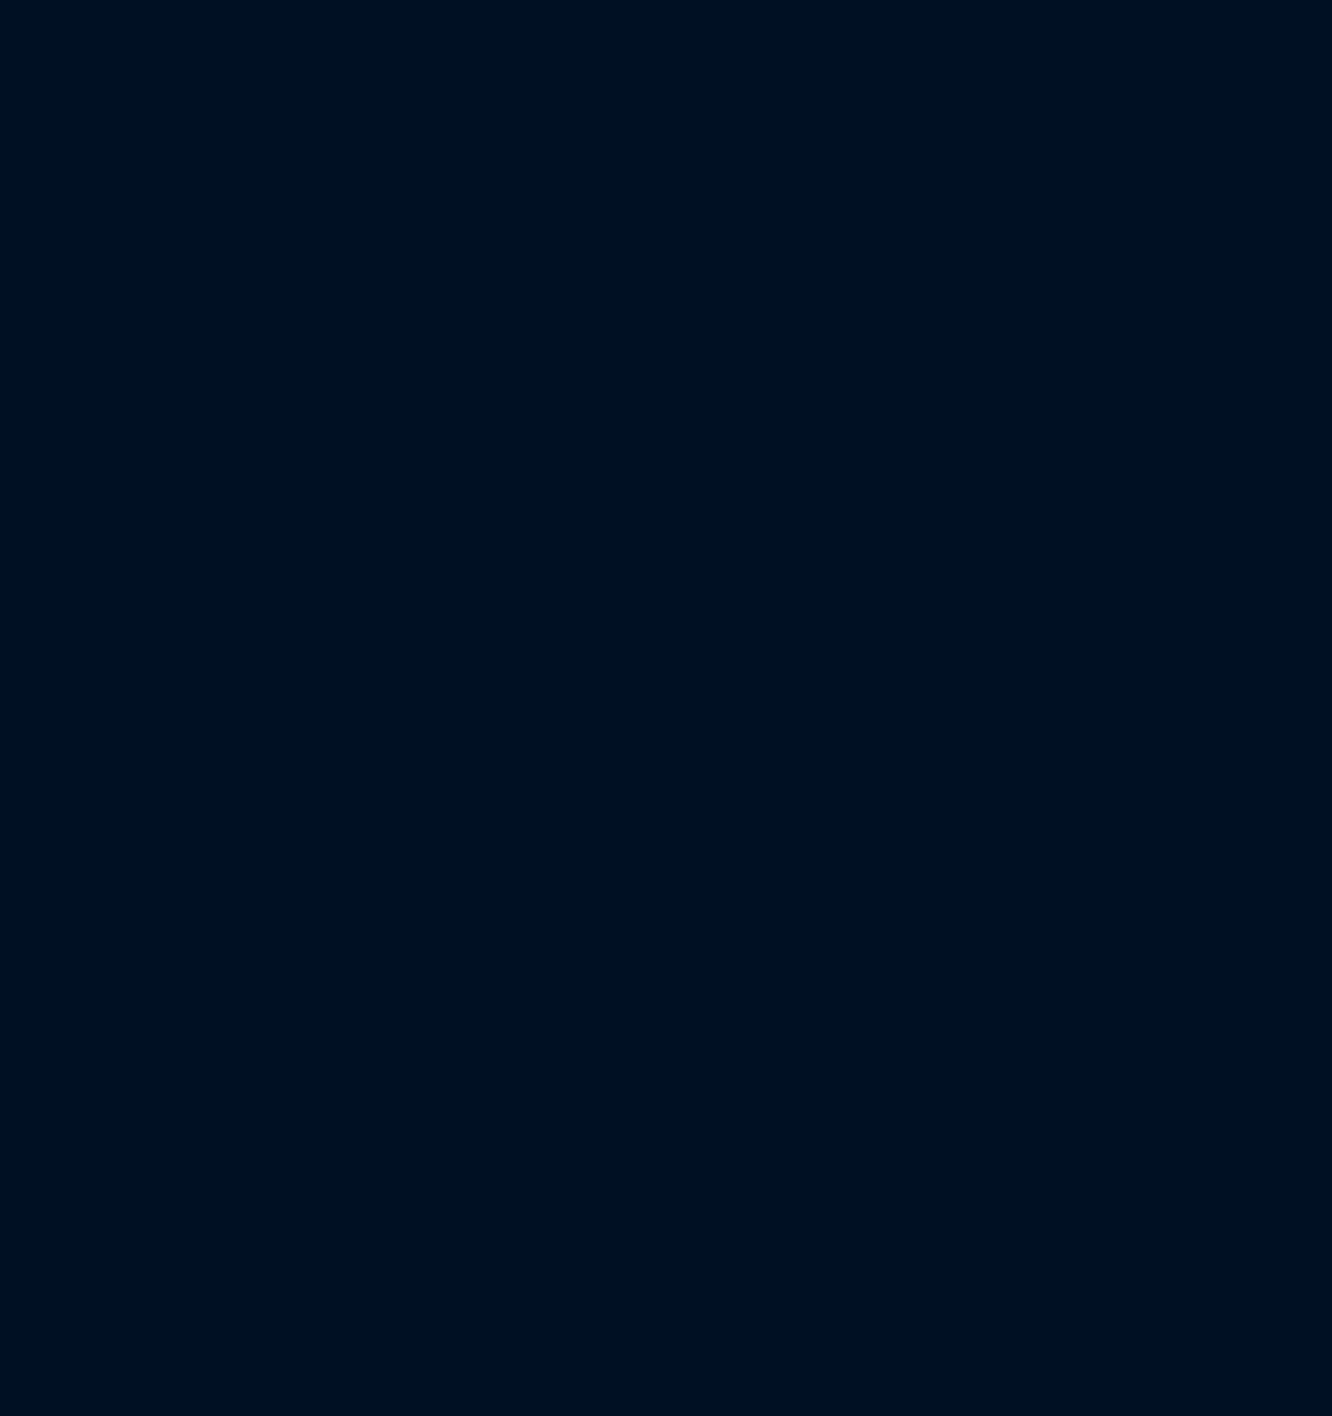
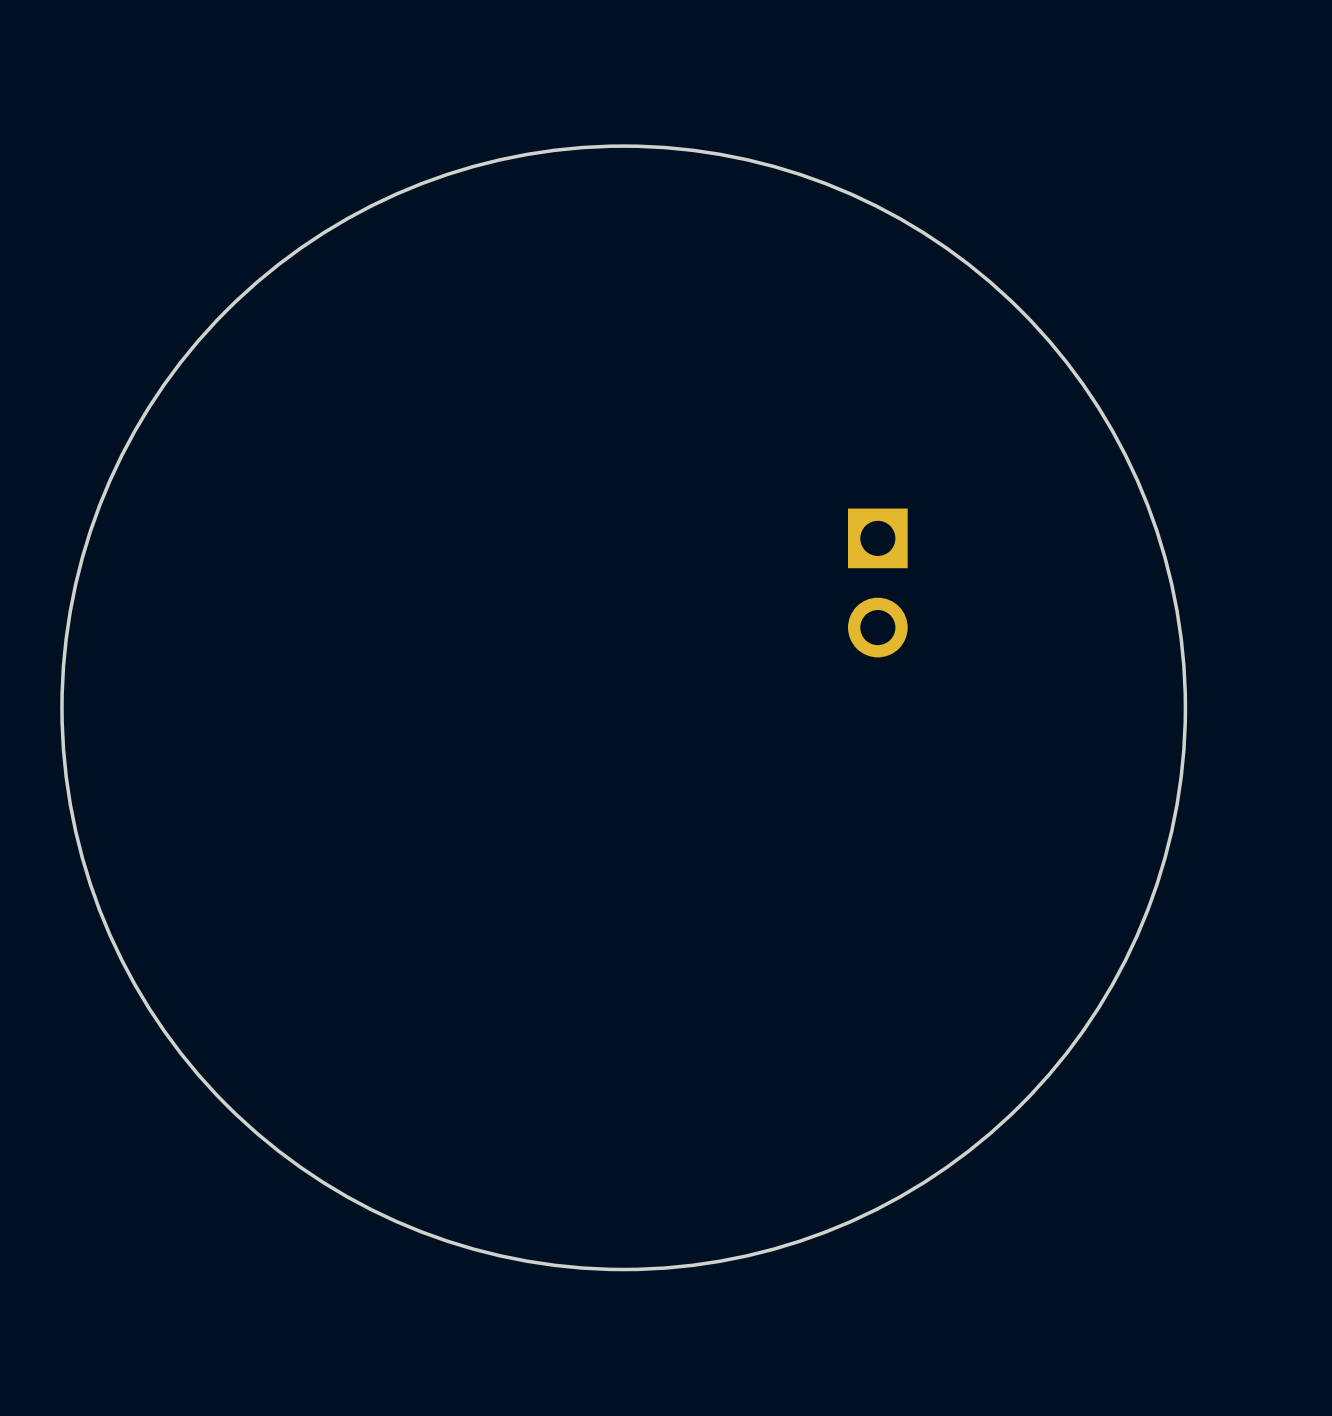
round board edge: none -> [60, 144, 1188, 1272]
part: none -> (877, 582)

